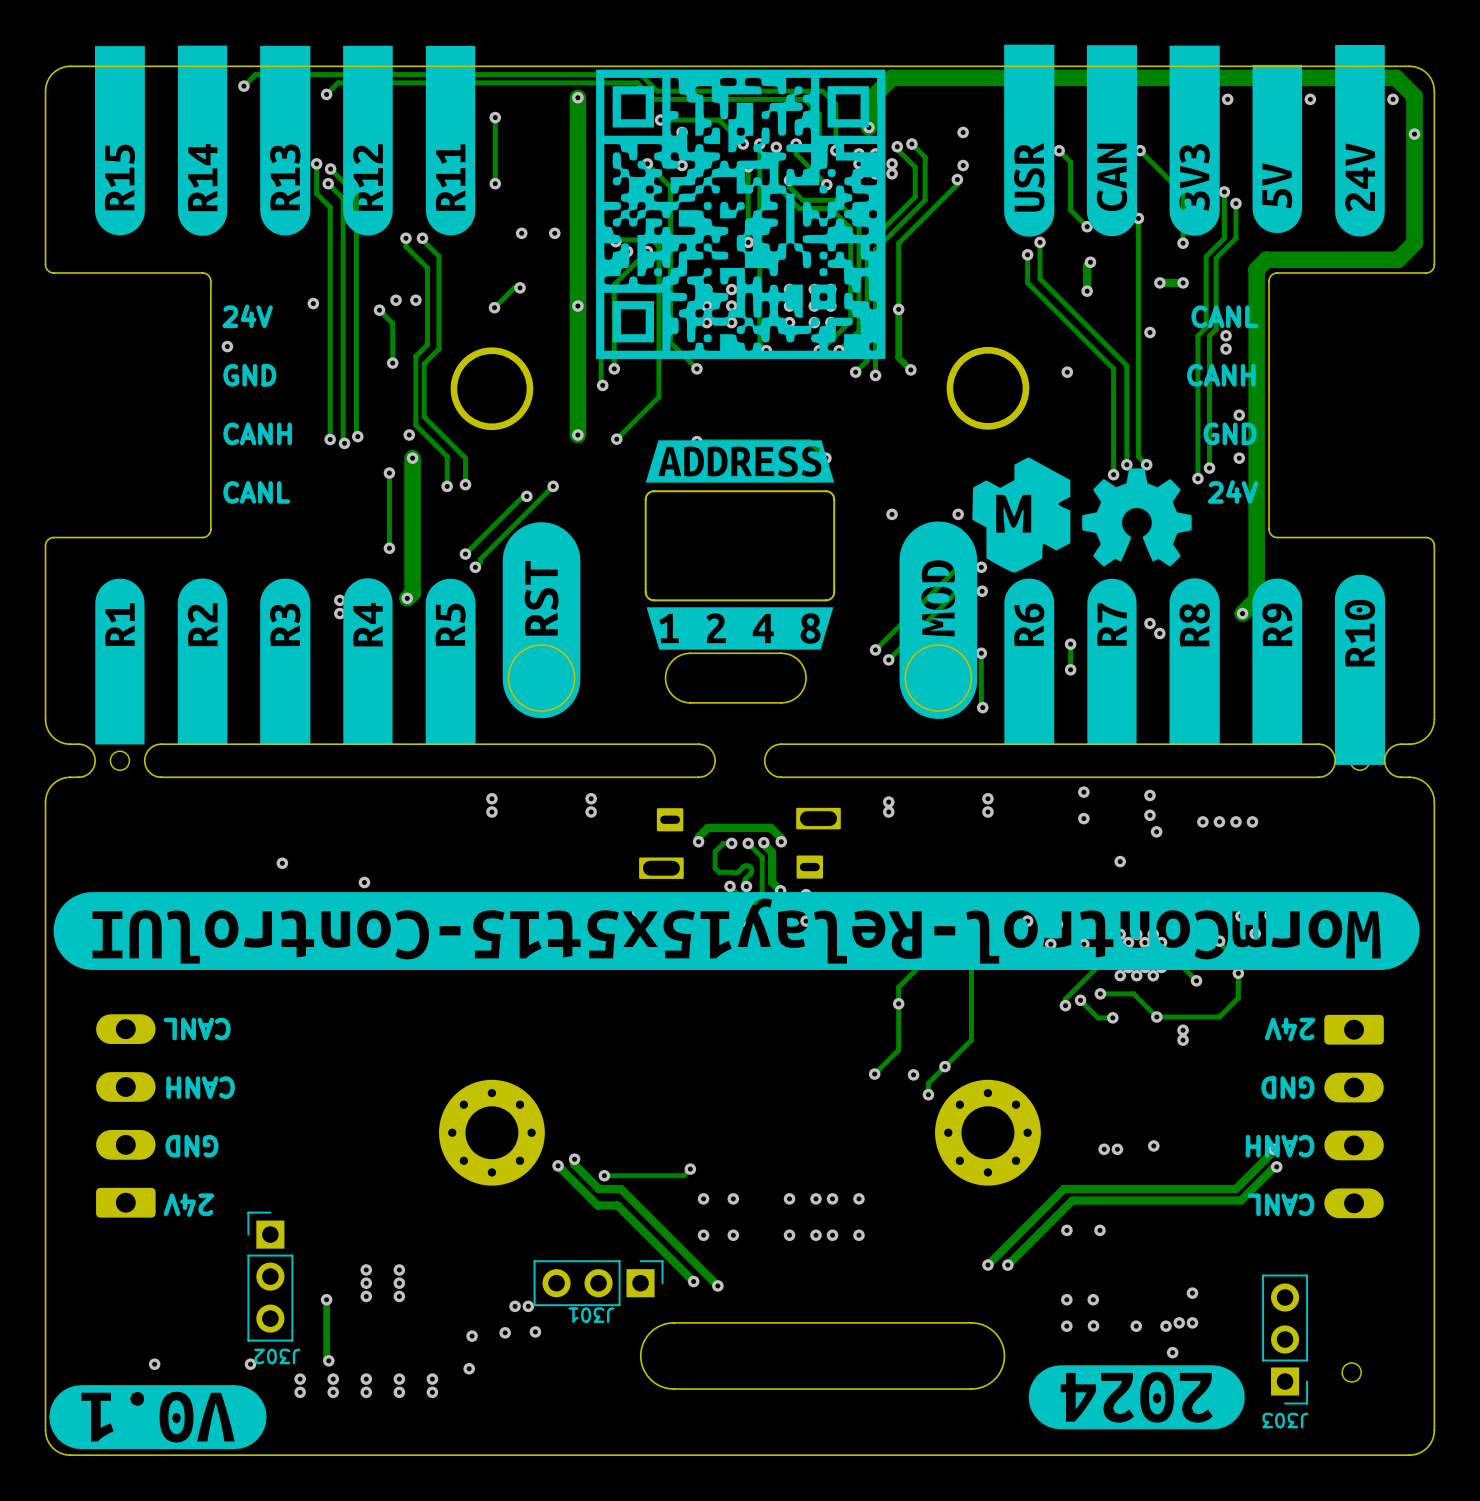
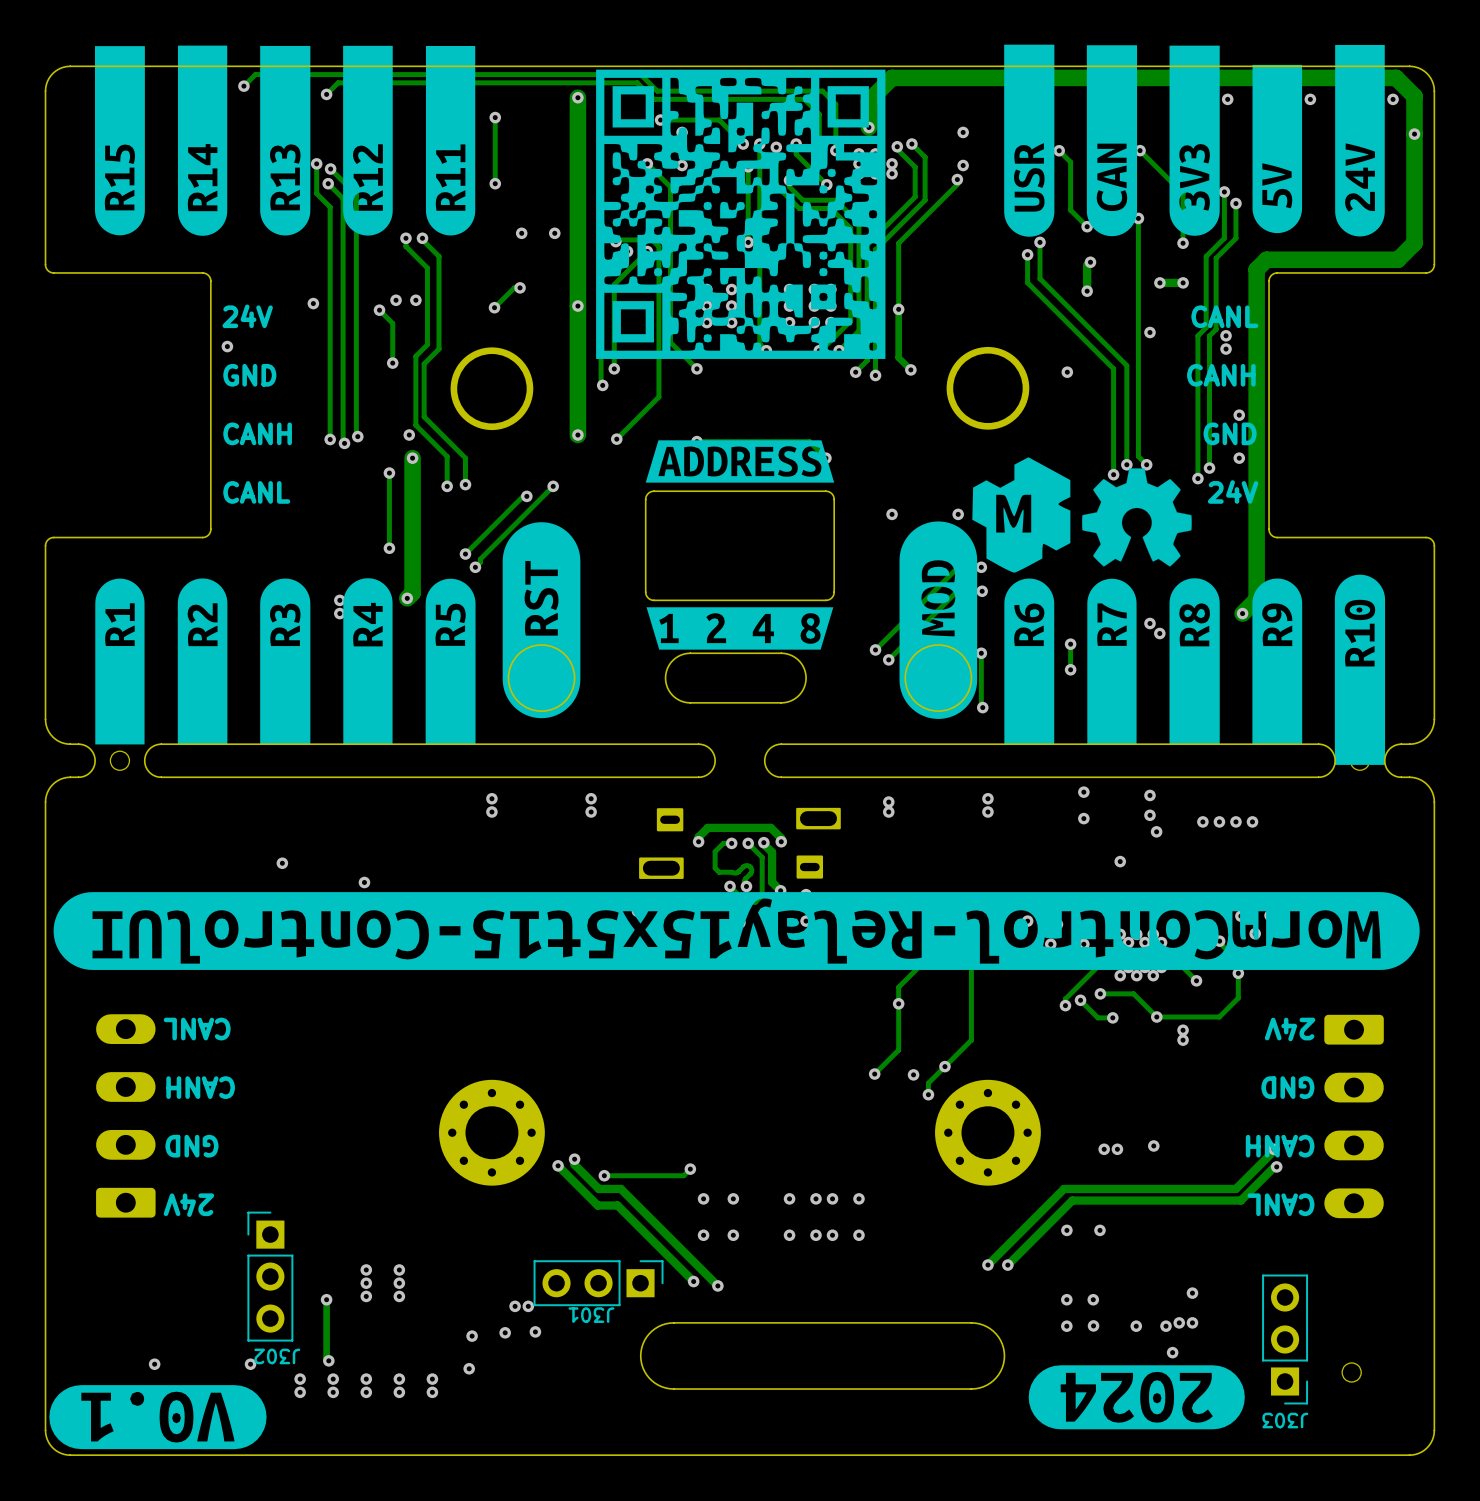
board edge: none -> (825, 491) (649, 492) (645, 499) (646, 596) (653, 600) (830, 599) (834, 592) (834, 499) (831, 493) (825, 491)
part: (739, 545) -> none

